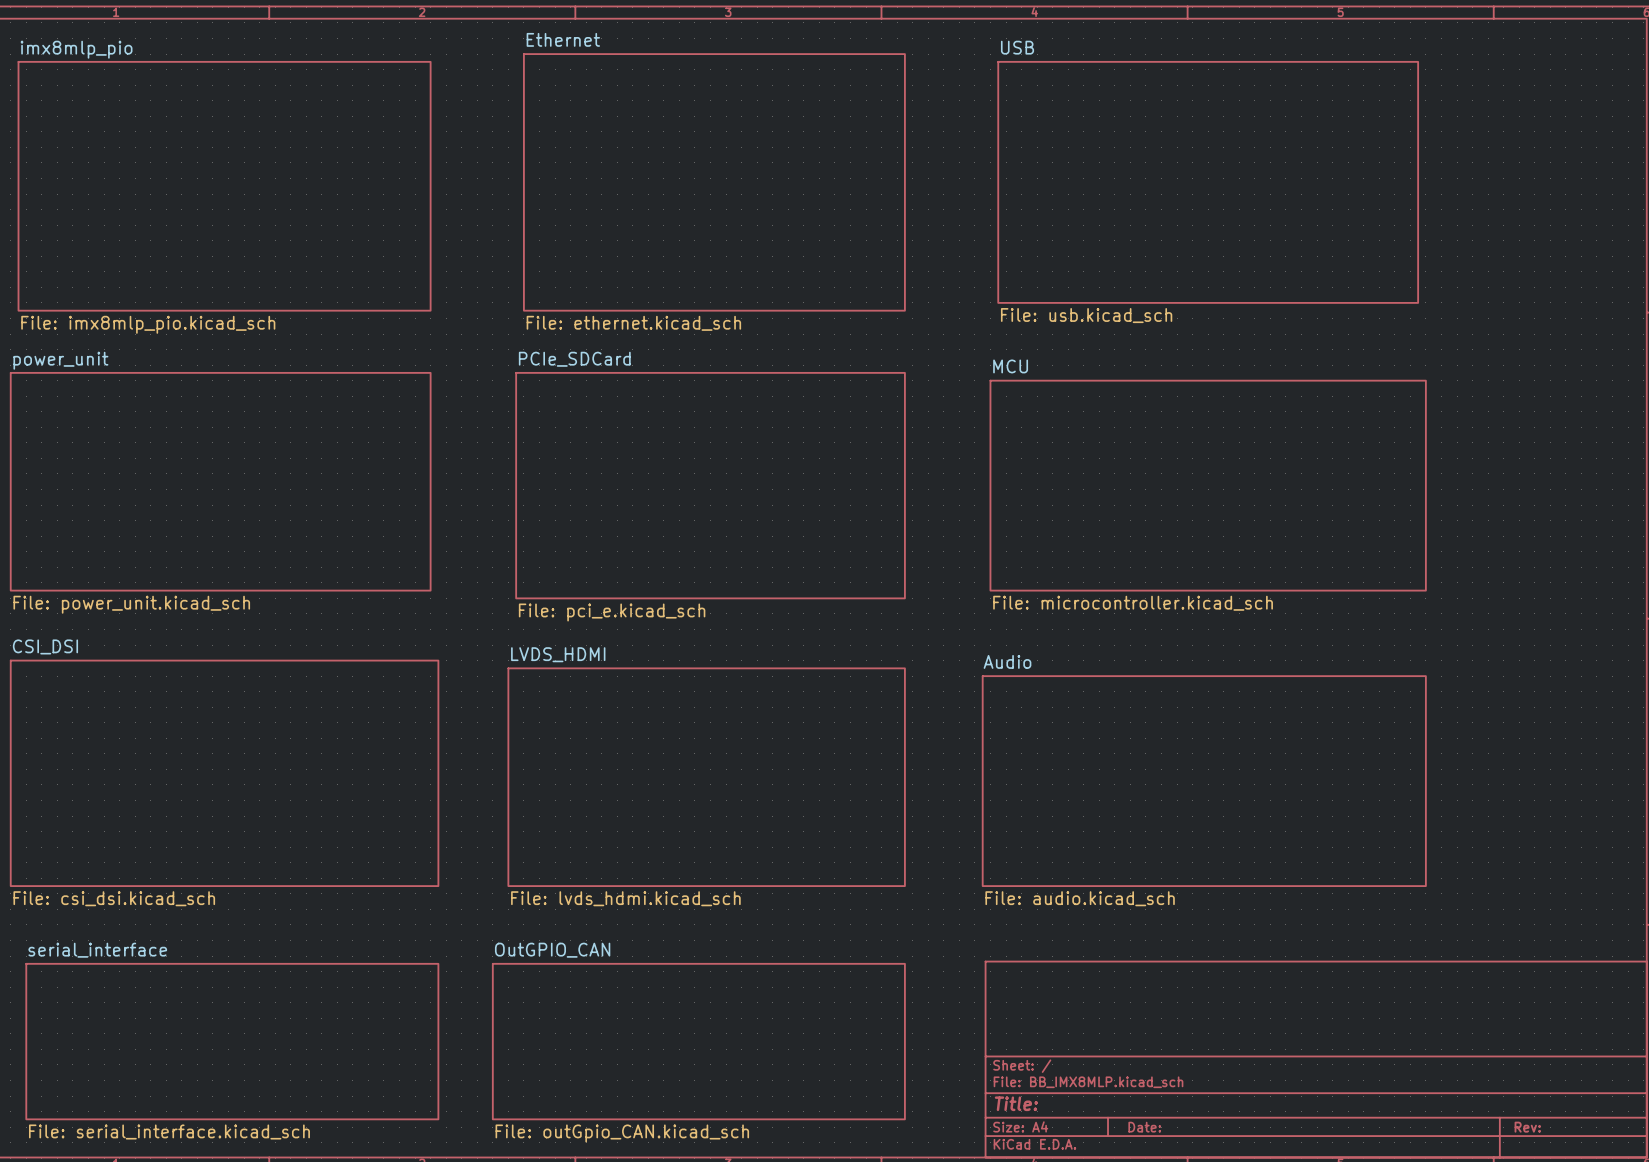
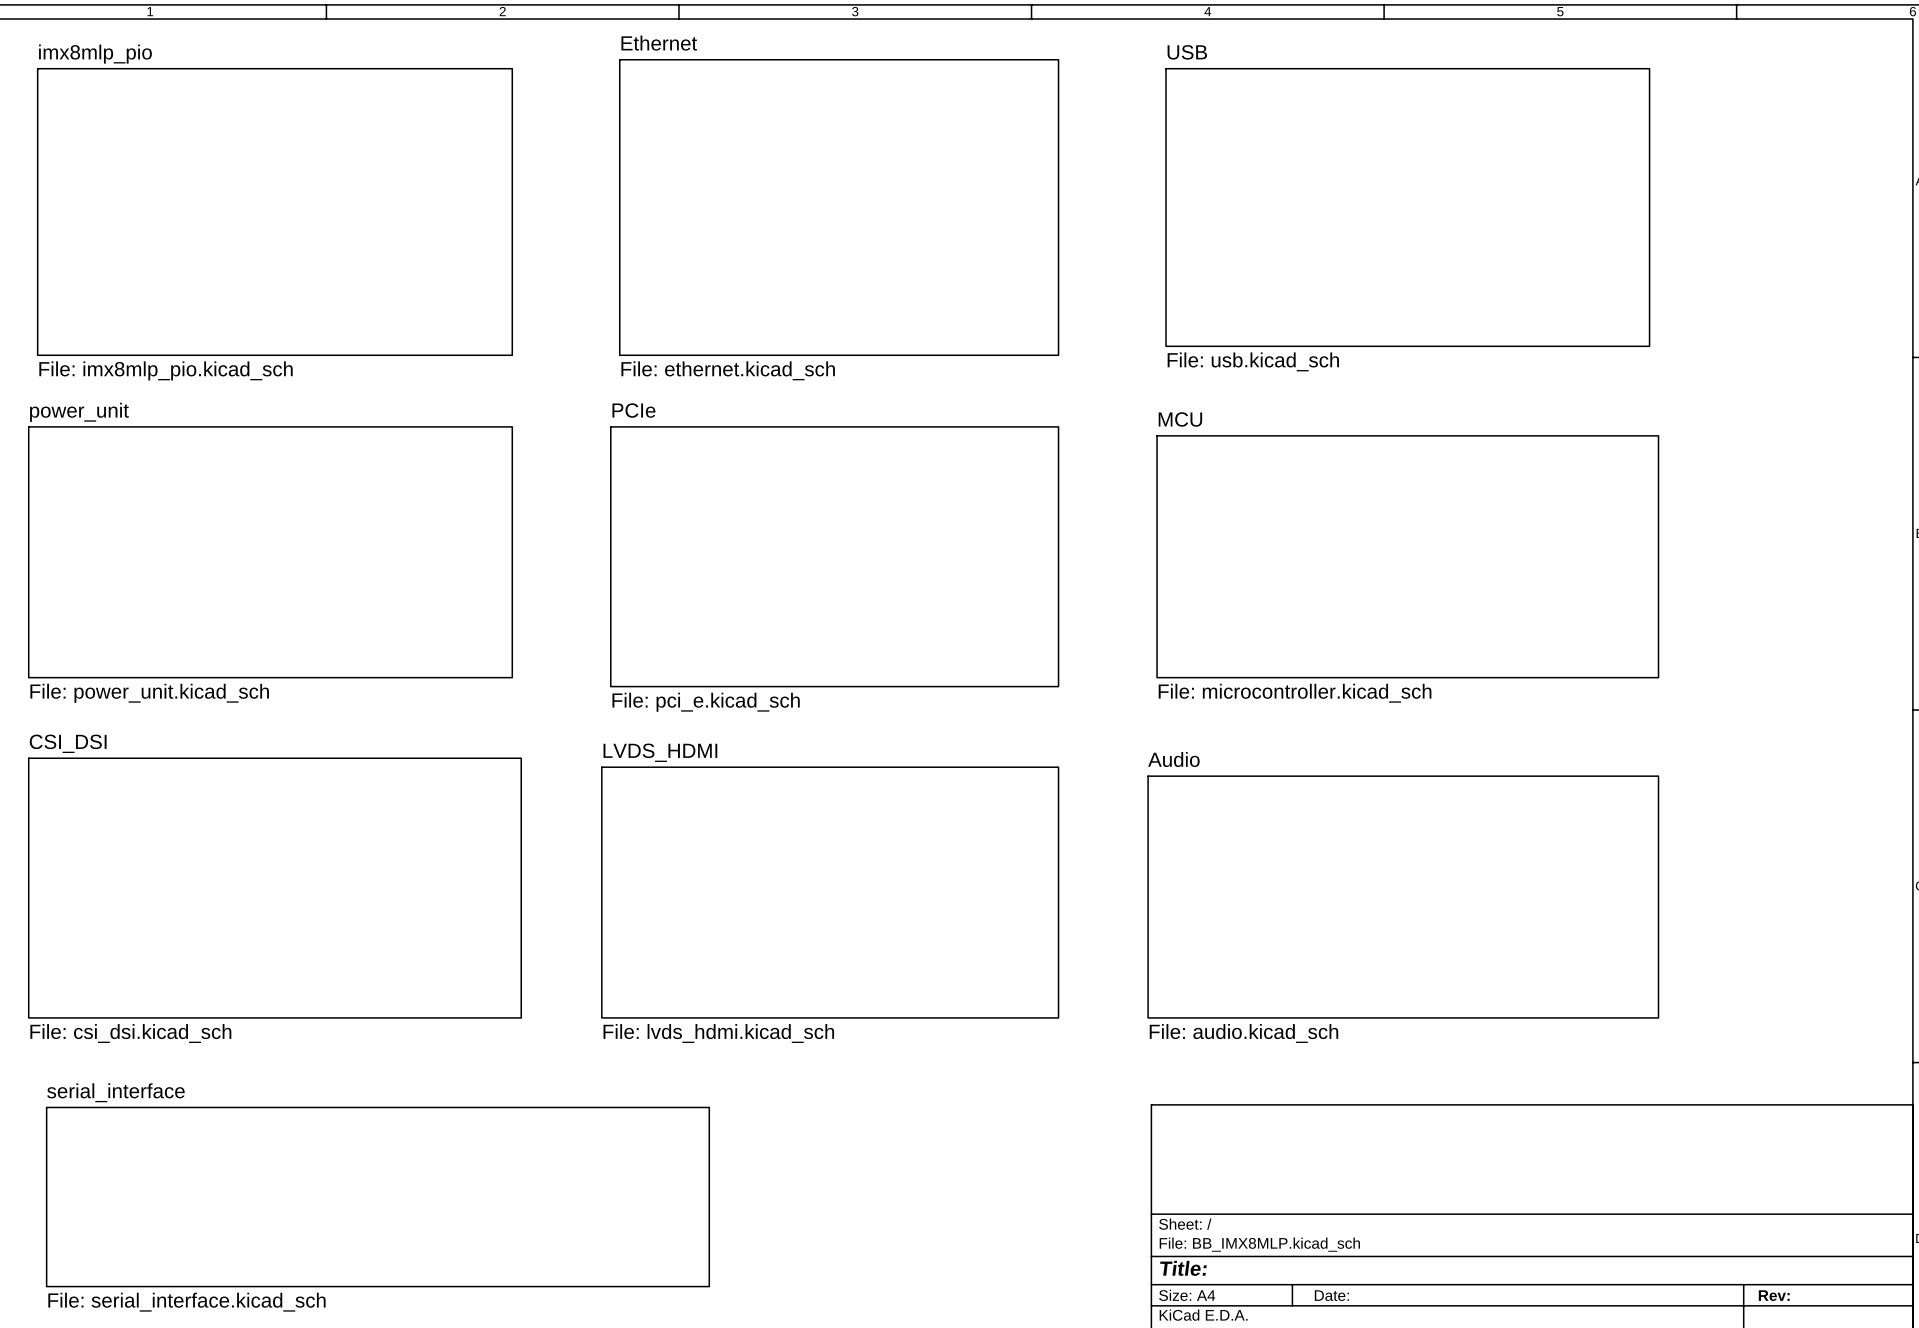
sheet PCIe_SDCard name: PCIe_SDCard (574, 359) -> PCIe (633, 410)
sheet serial_interface: File: serial_interface.kicad_sch (232, 1041) -> none
sheet serial_interface: none -> File: serial_interface.kicad_sch (377, 1197)
sheet OutGPIO_CAN: File: outGpio_CAN.kicad_sch (698, 1041) -> none

